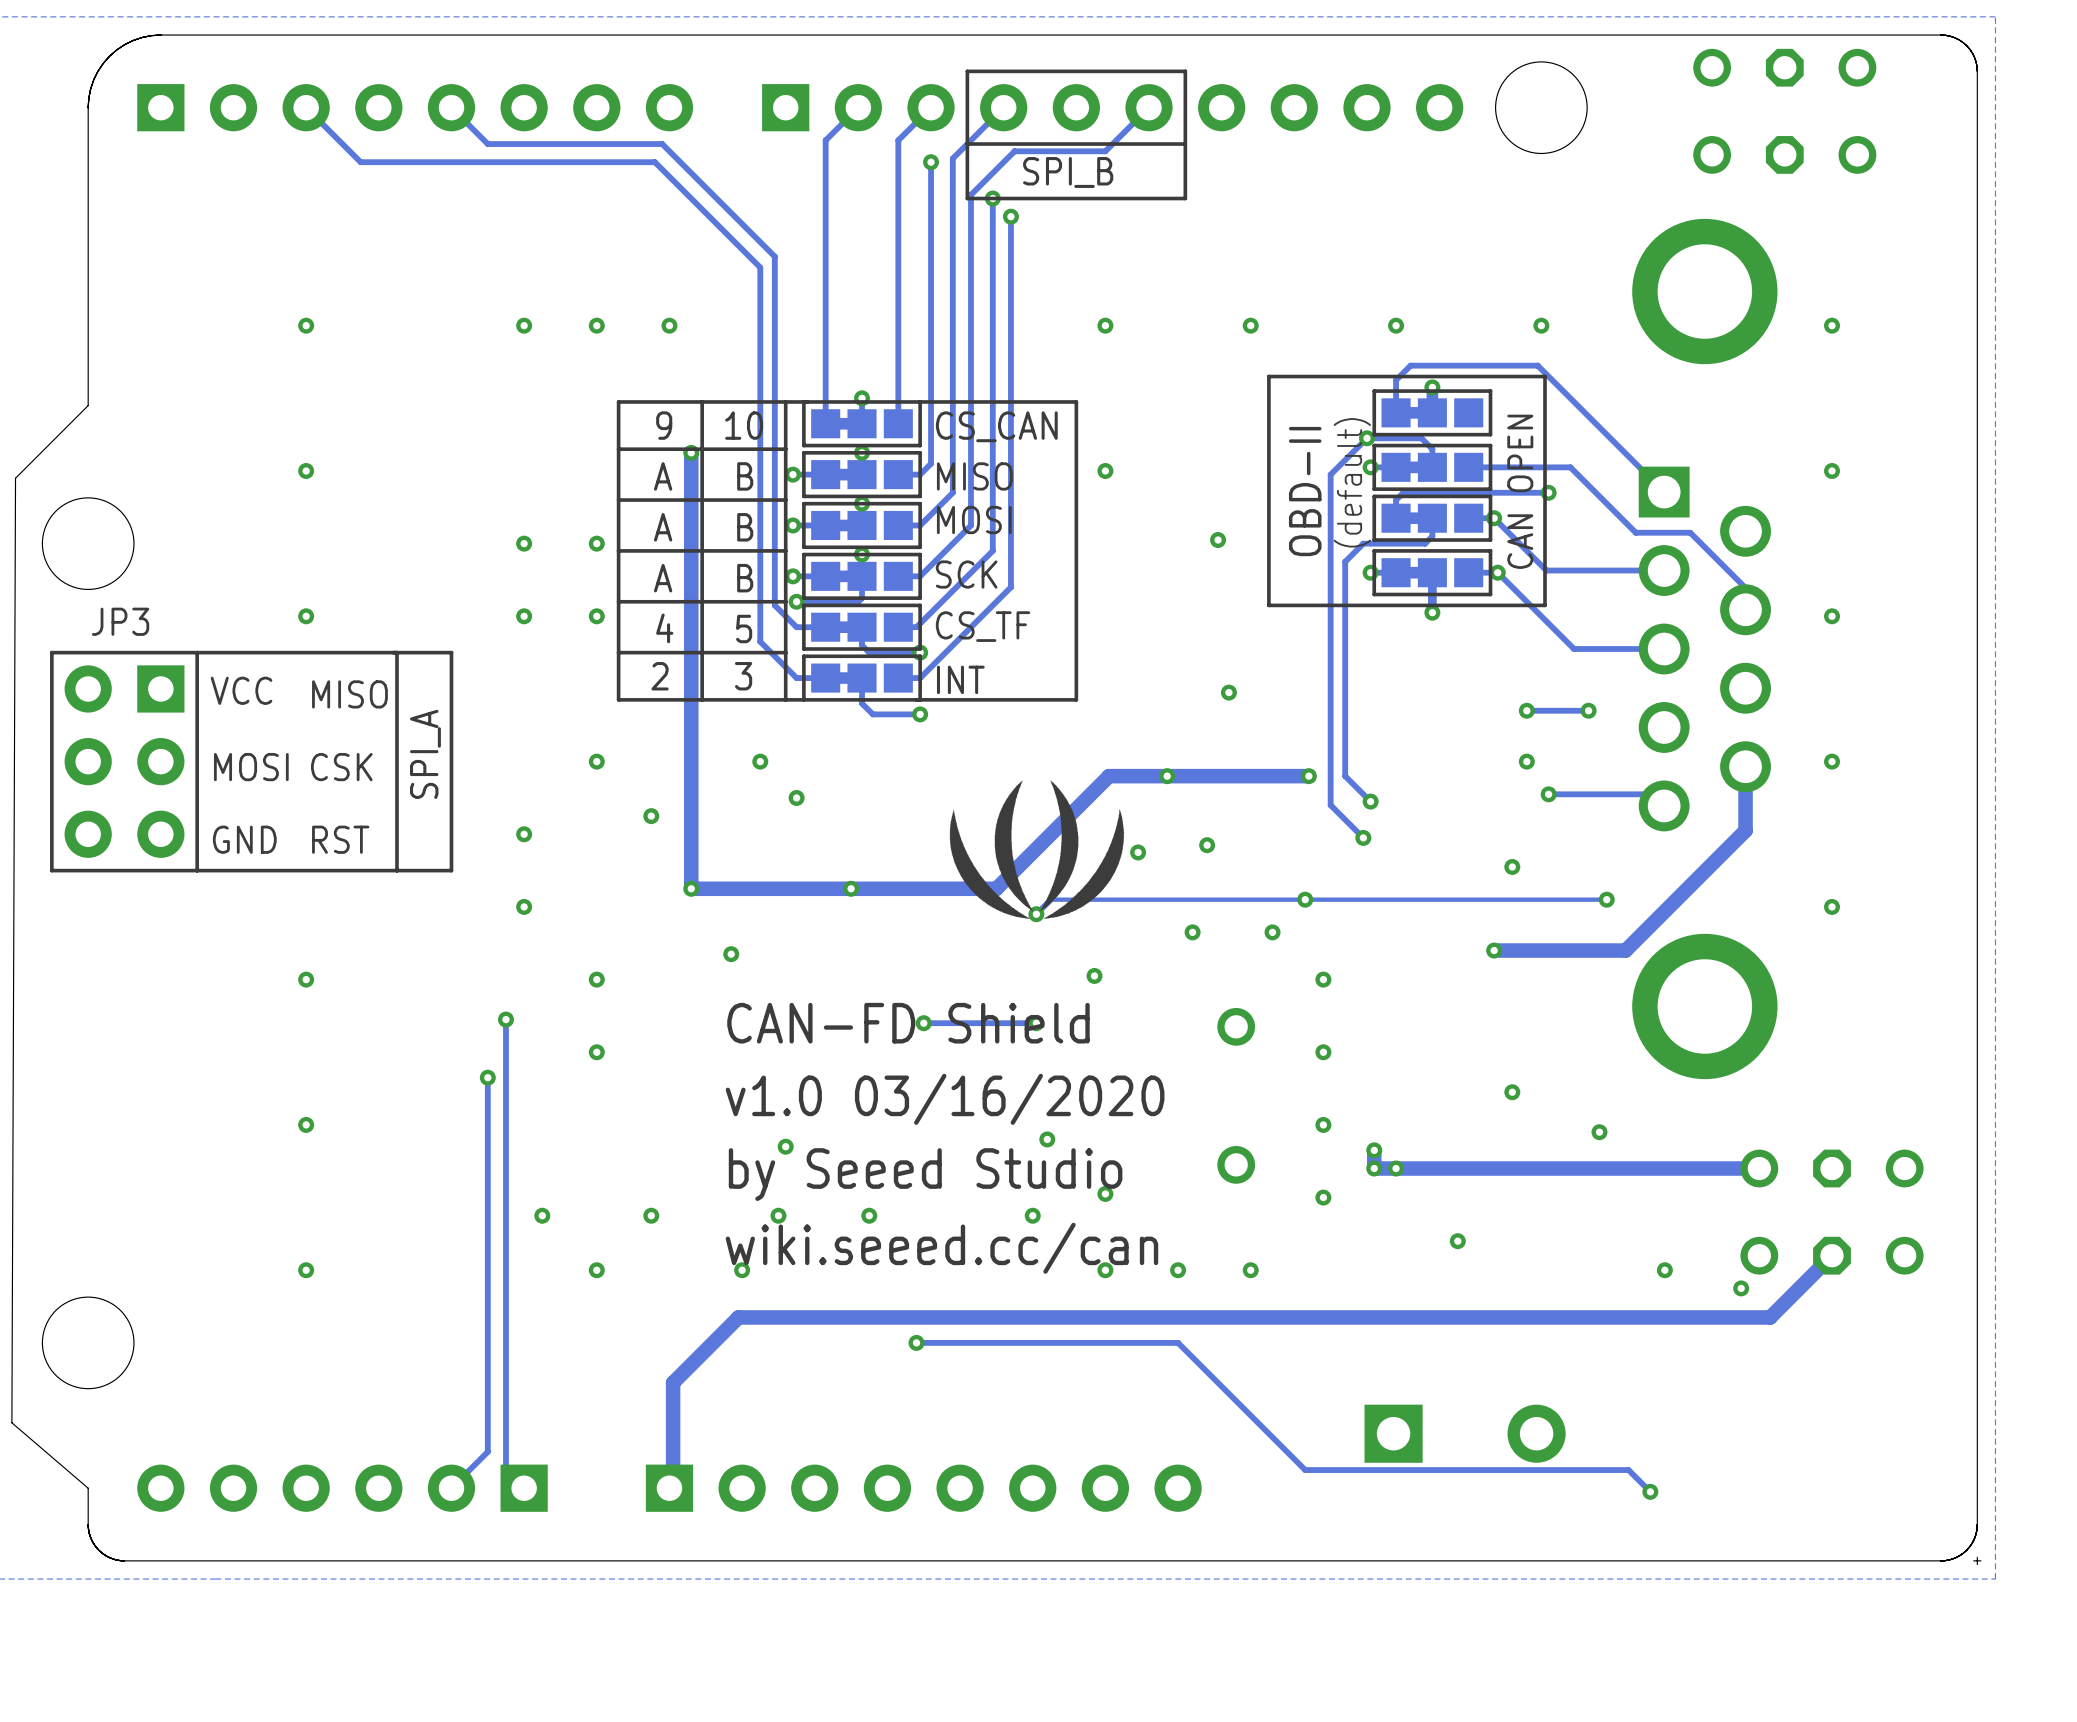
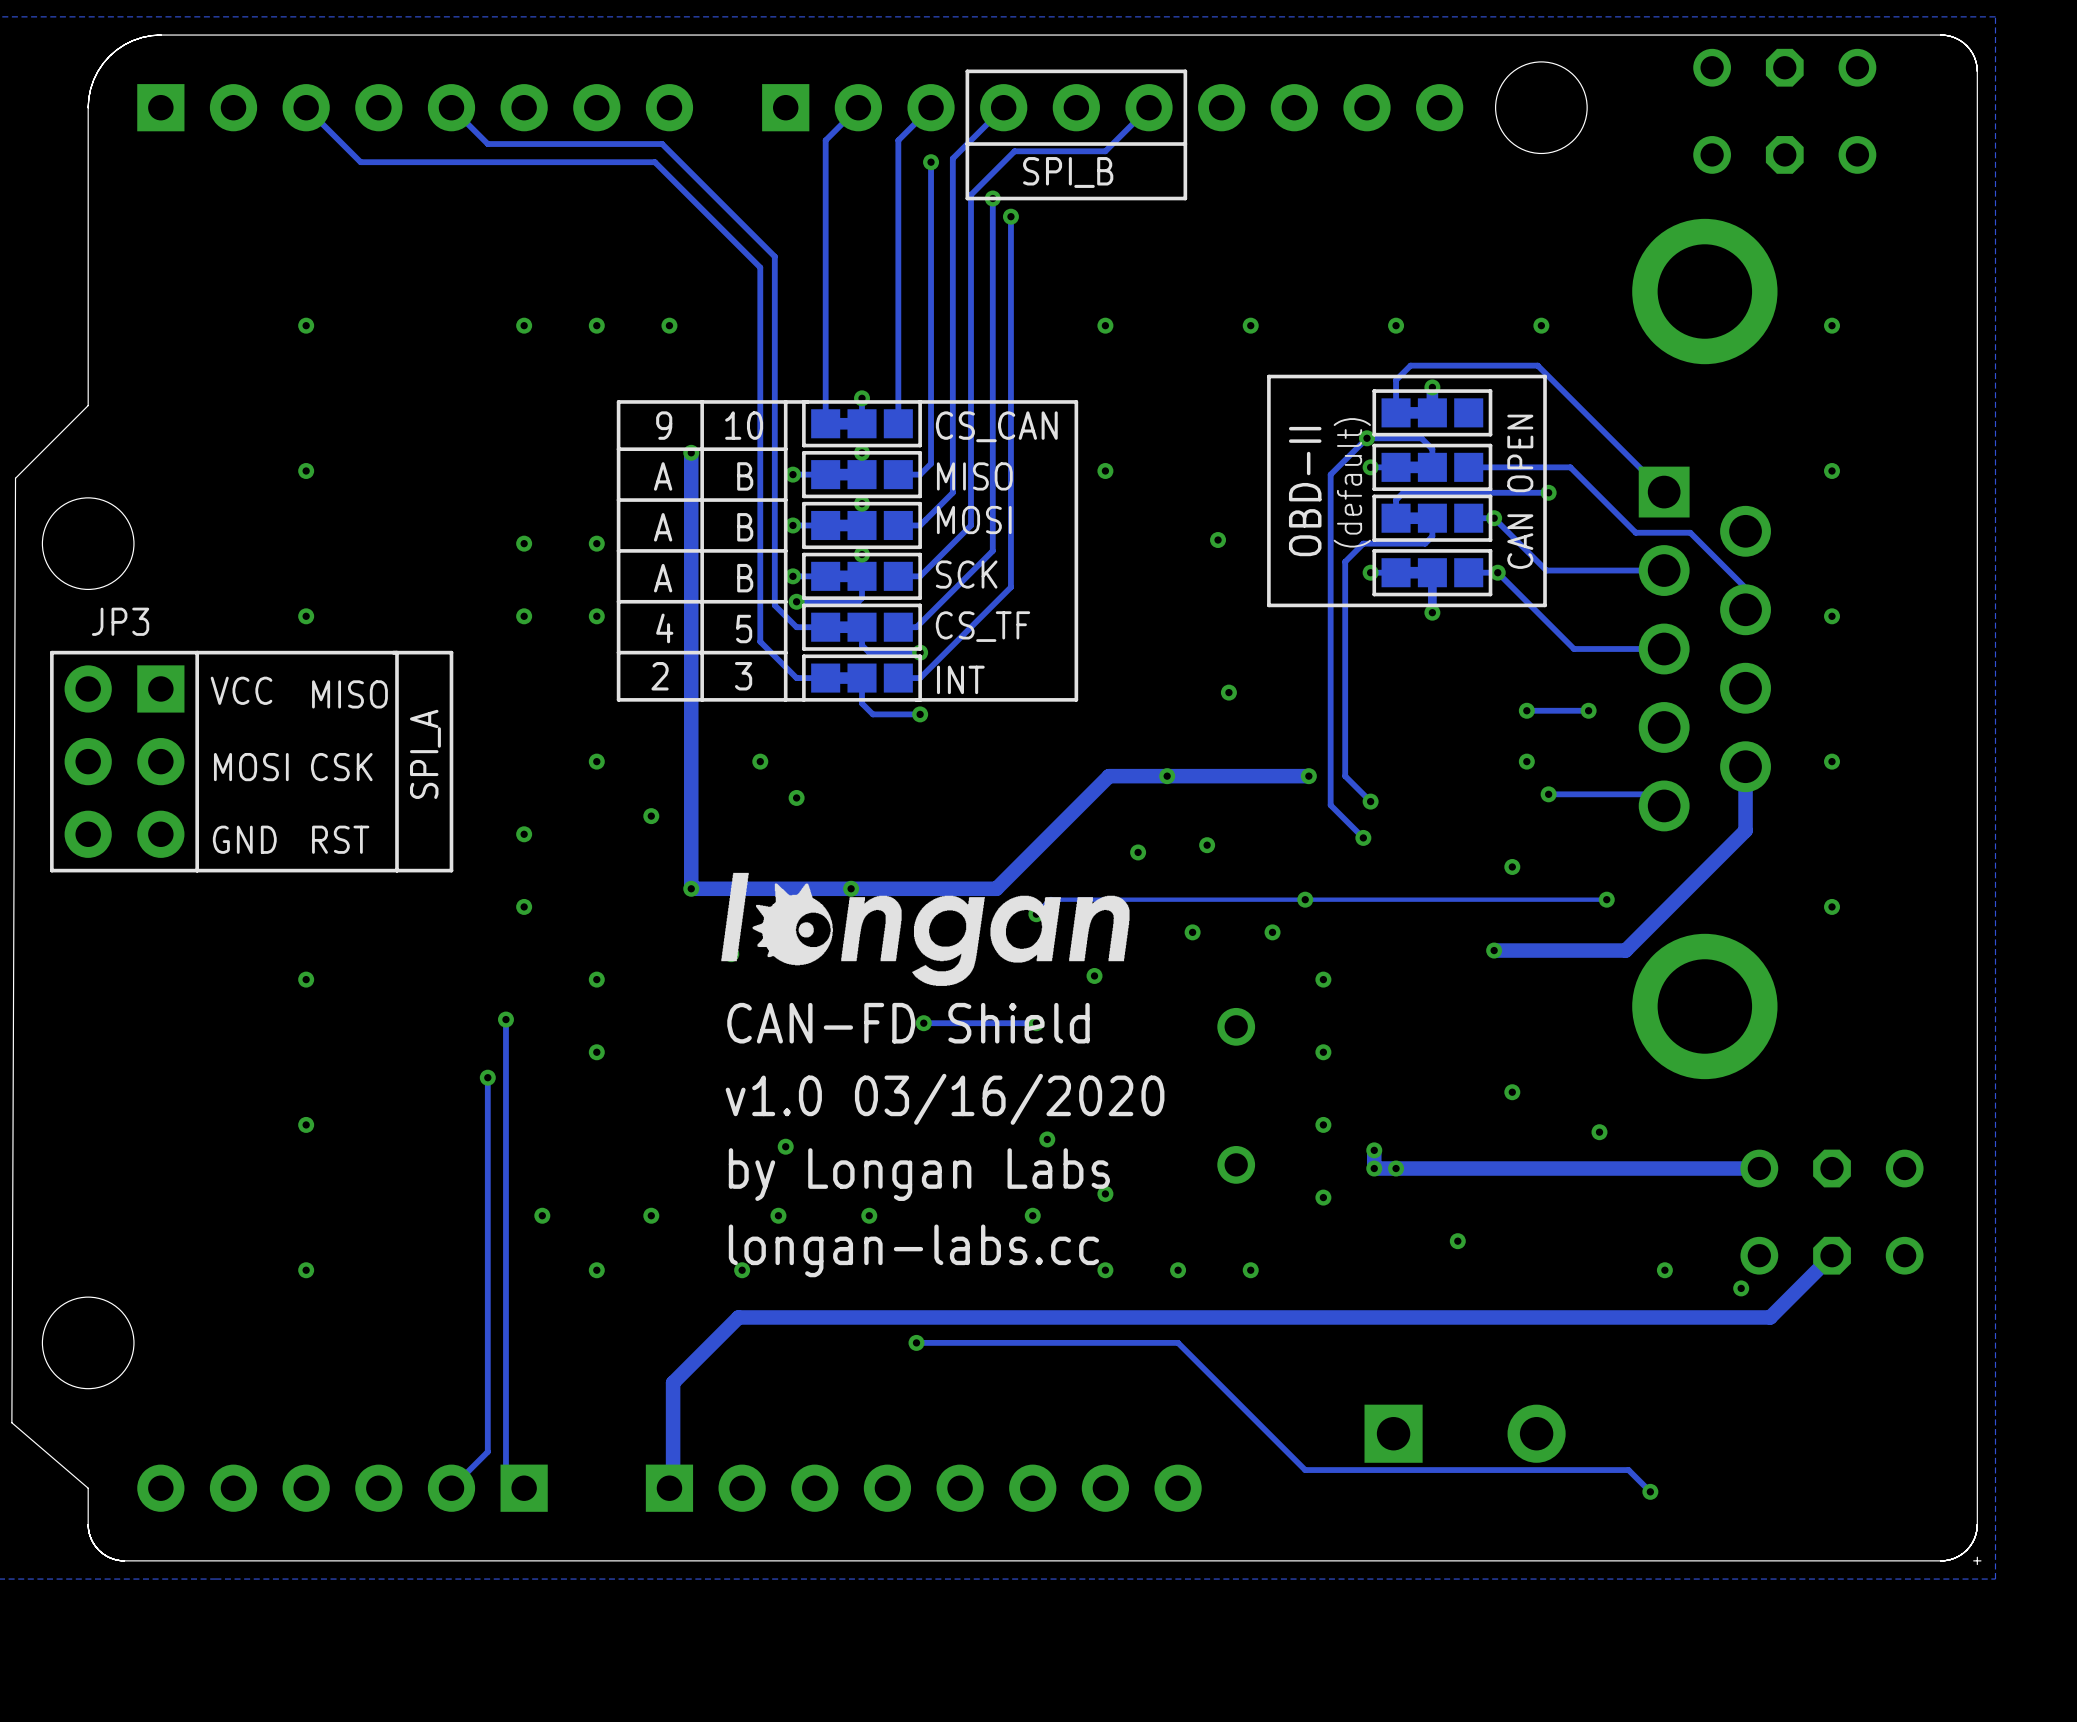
drawing: [949, 780, 1125, 919] -> none
drawing: none -> [721, 872, 1130, 986]
text: by Seeed Studio (925, 1174) -> by Longan Labs (919, 1174)
text: wiki.seeed.cc/can (941, 1248) -> longan-labs.cc (913, 1250)

